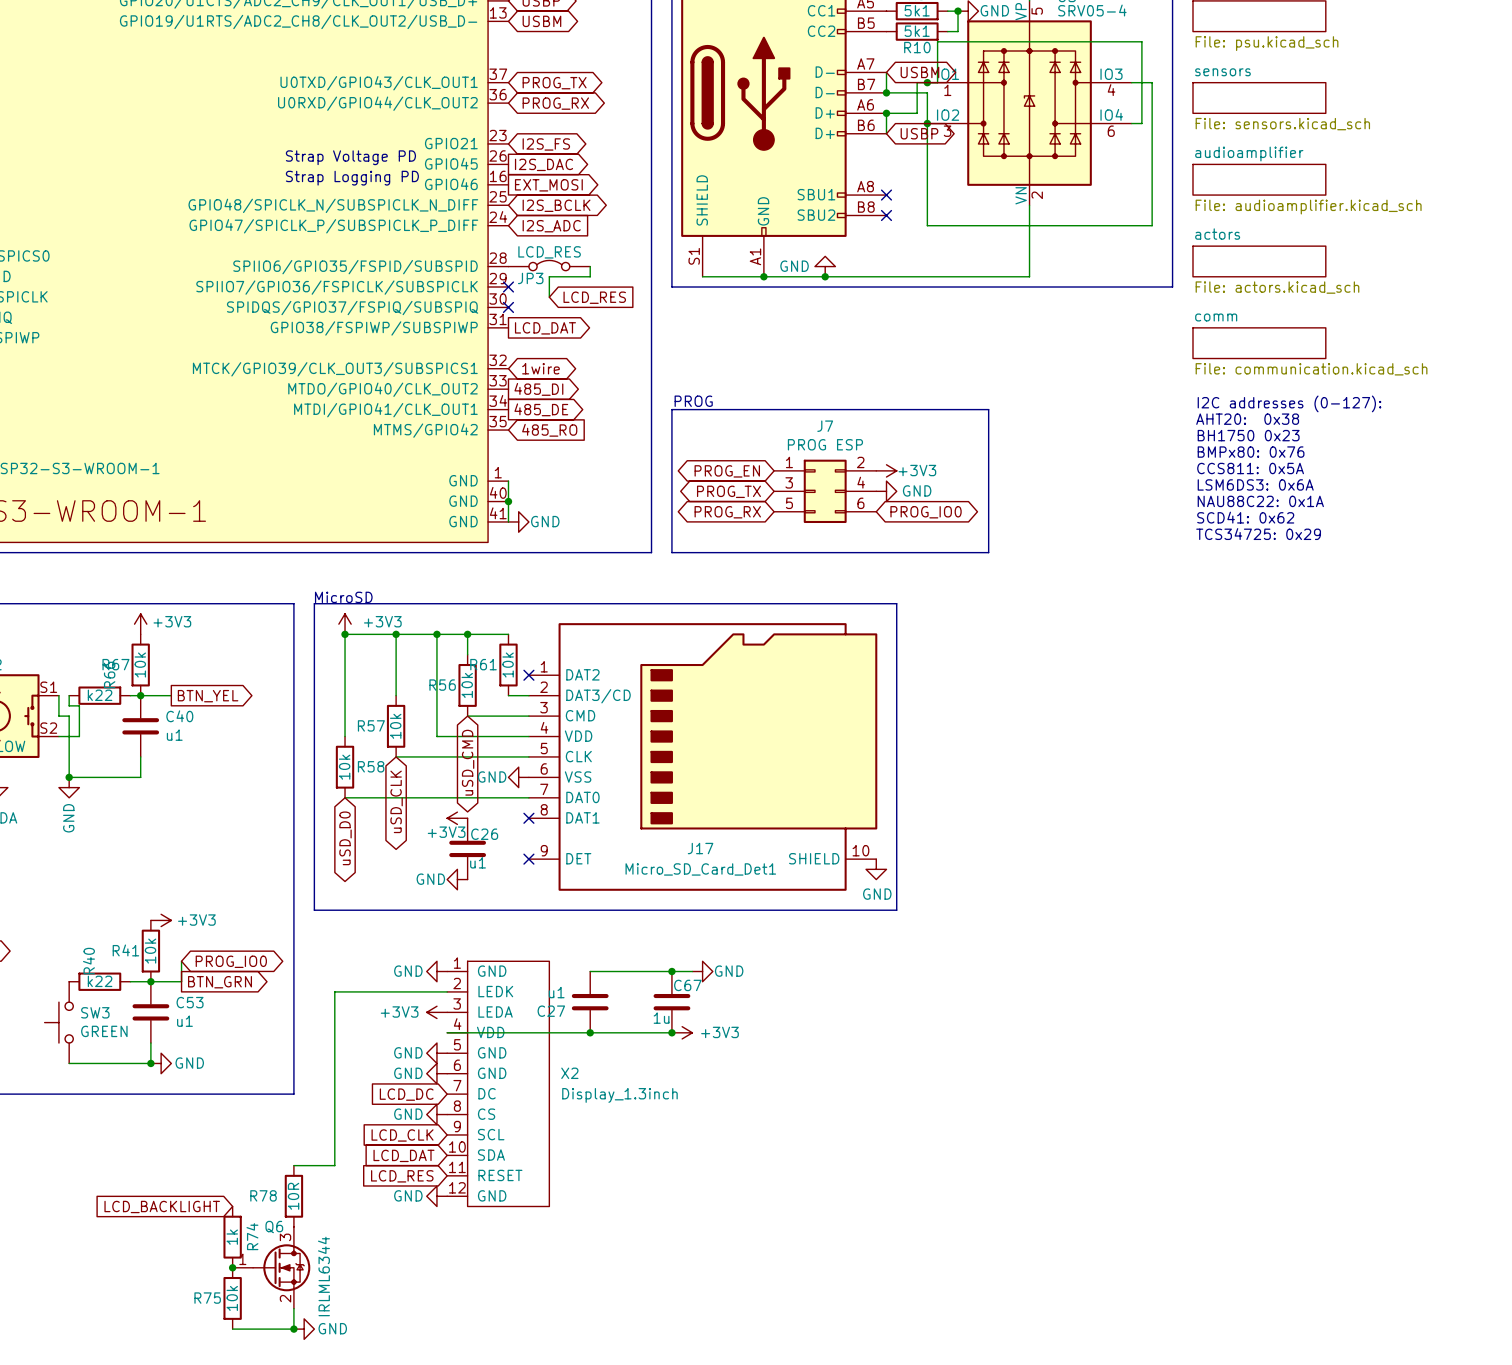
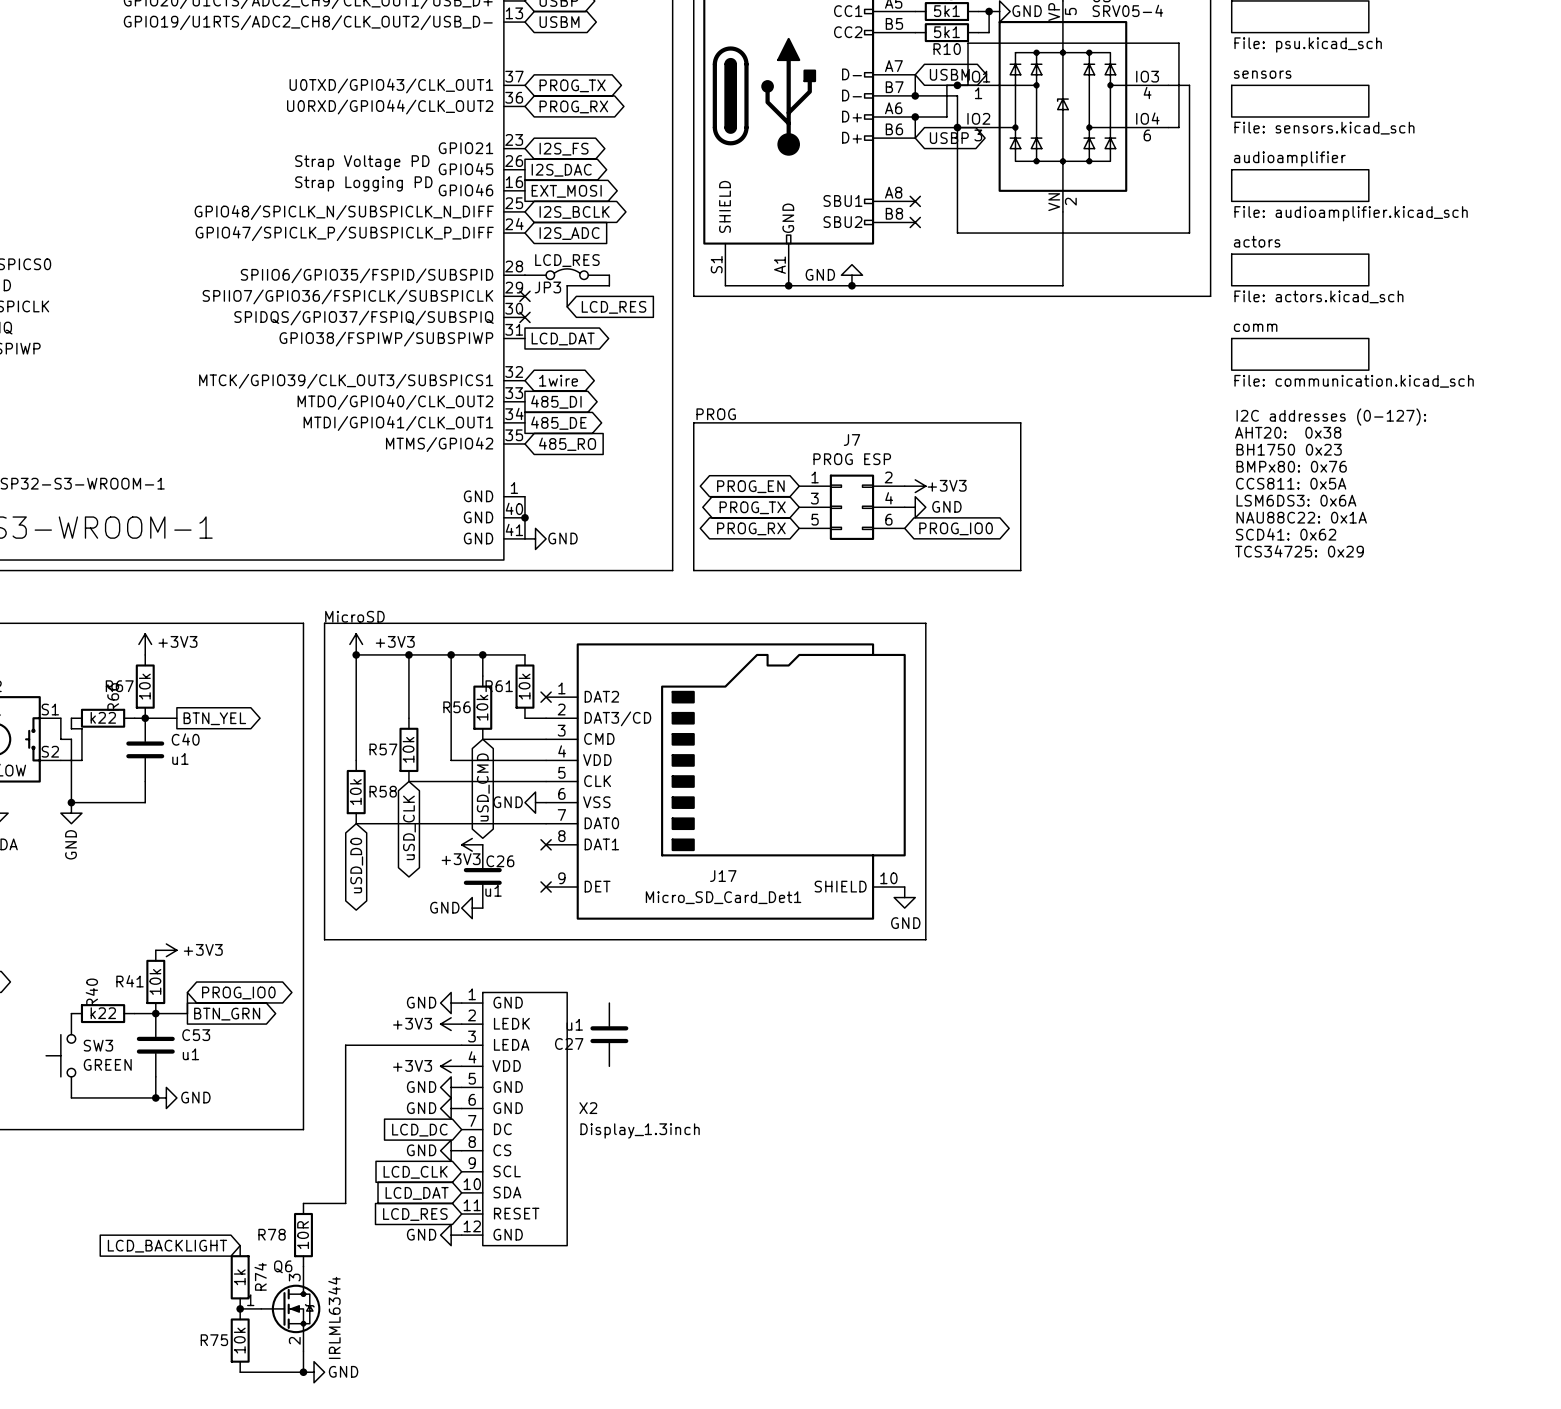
wire: (590, 971) (692, 971) -> none
junction: (671, 971) -> none
power symbol: GND (702, 971) -> none
power symbol: none -> +3V3 (451, 1024)
wire: (447, 991) (334, 991) (334, 1012) -> (461, 1045) (345, 1045)
C67: 1u (671, 1002) -> none
power symbol: +3V3 (436, 1012) -> none
power symbol: none -> +3V3 (451, 1066)
wire: (447, 1032) (671, 1032) -> none
junction: (590, 1032) -> none
junction: (671, 1032) -> none
power symbol: +3V3 (682, 1032) -> none

